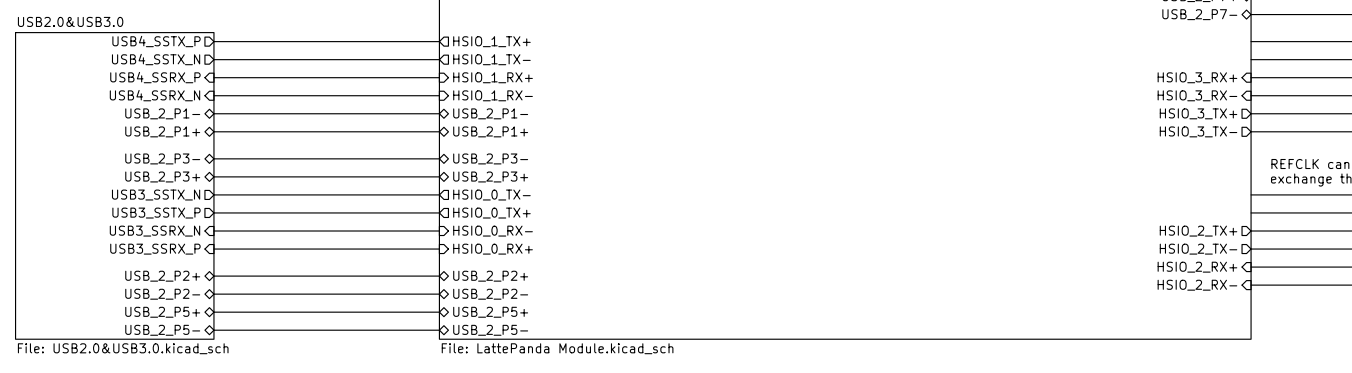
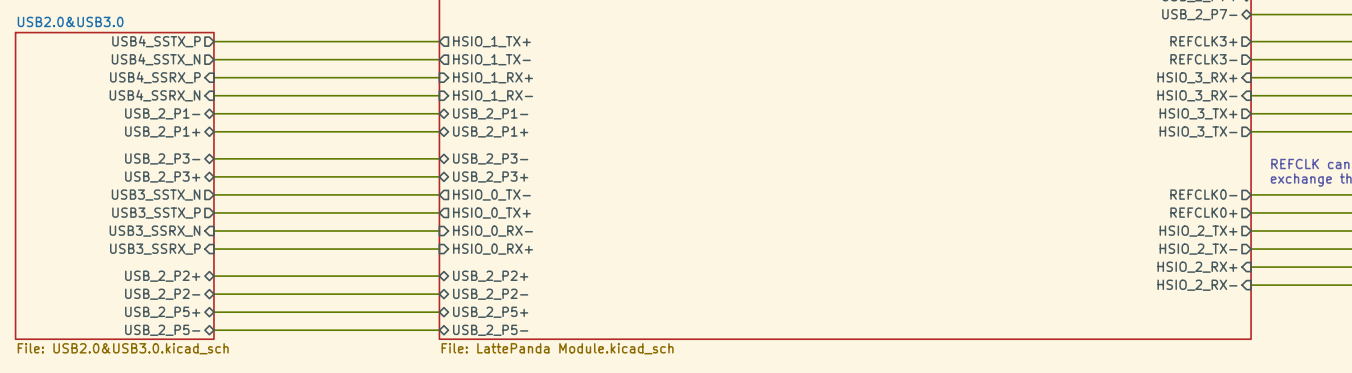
sheet pin: none -> REFCLK3+ (1203, 41)
sheet pin: none -> REFCLK3- (1203, 59)
sheet pin: none -> REFCLK0- (1203, 194)
sheet pin: none -> REFCLK0+ (1203, 212)

